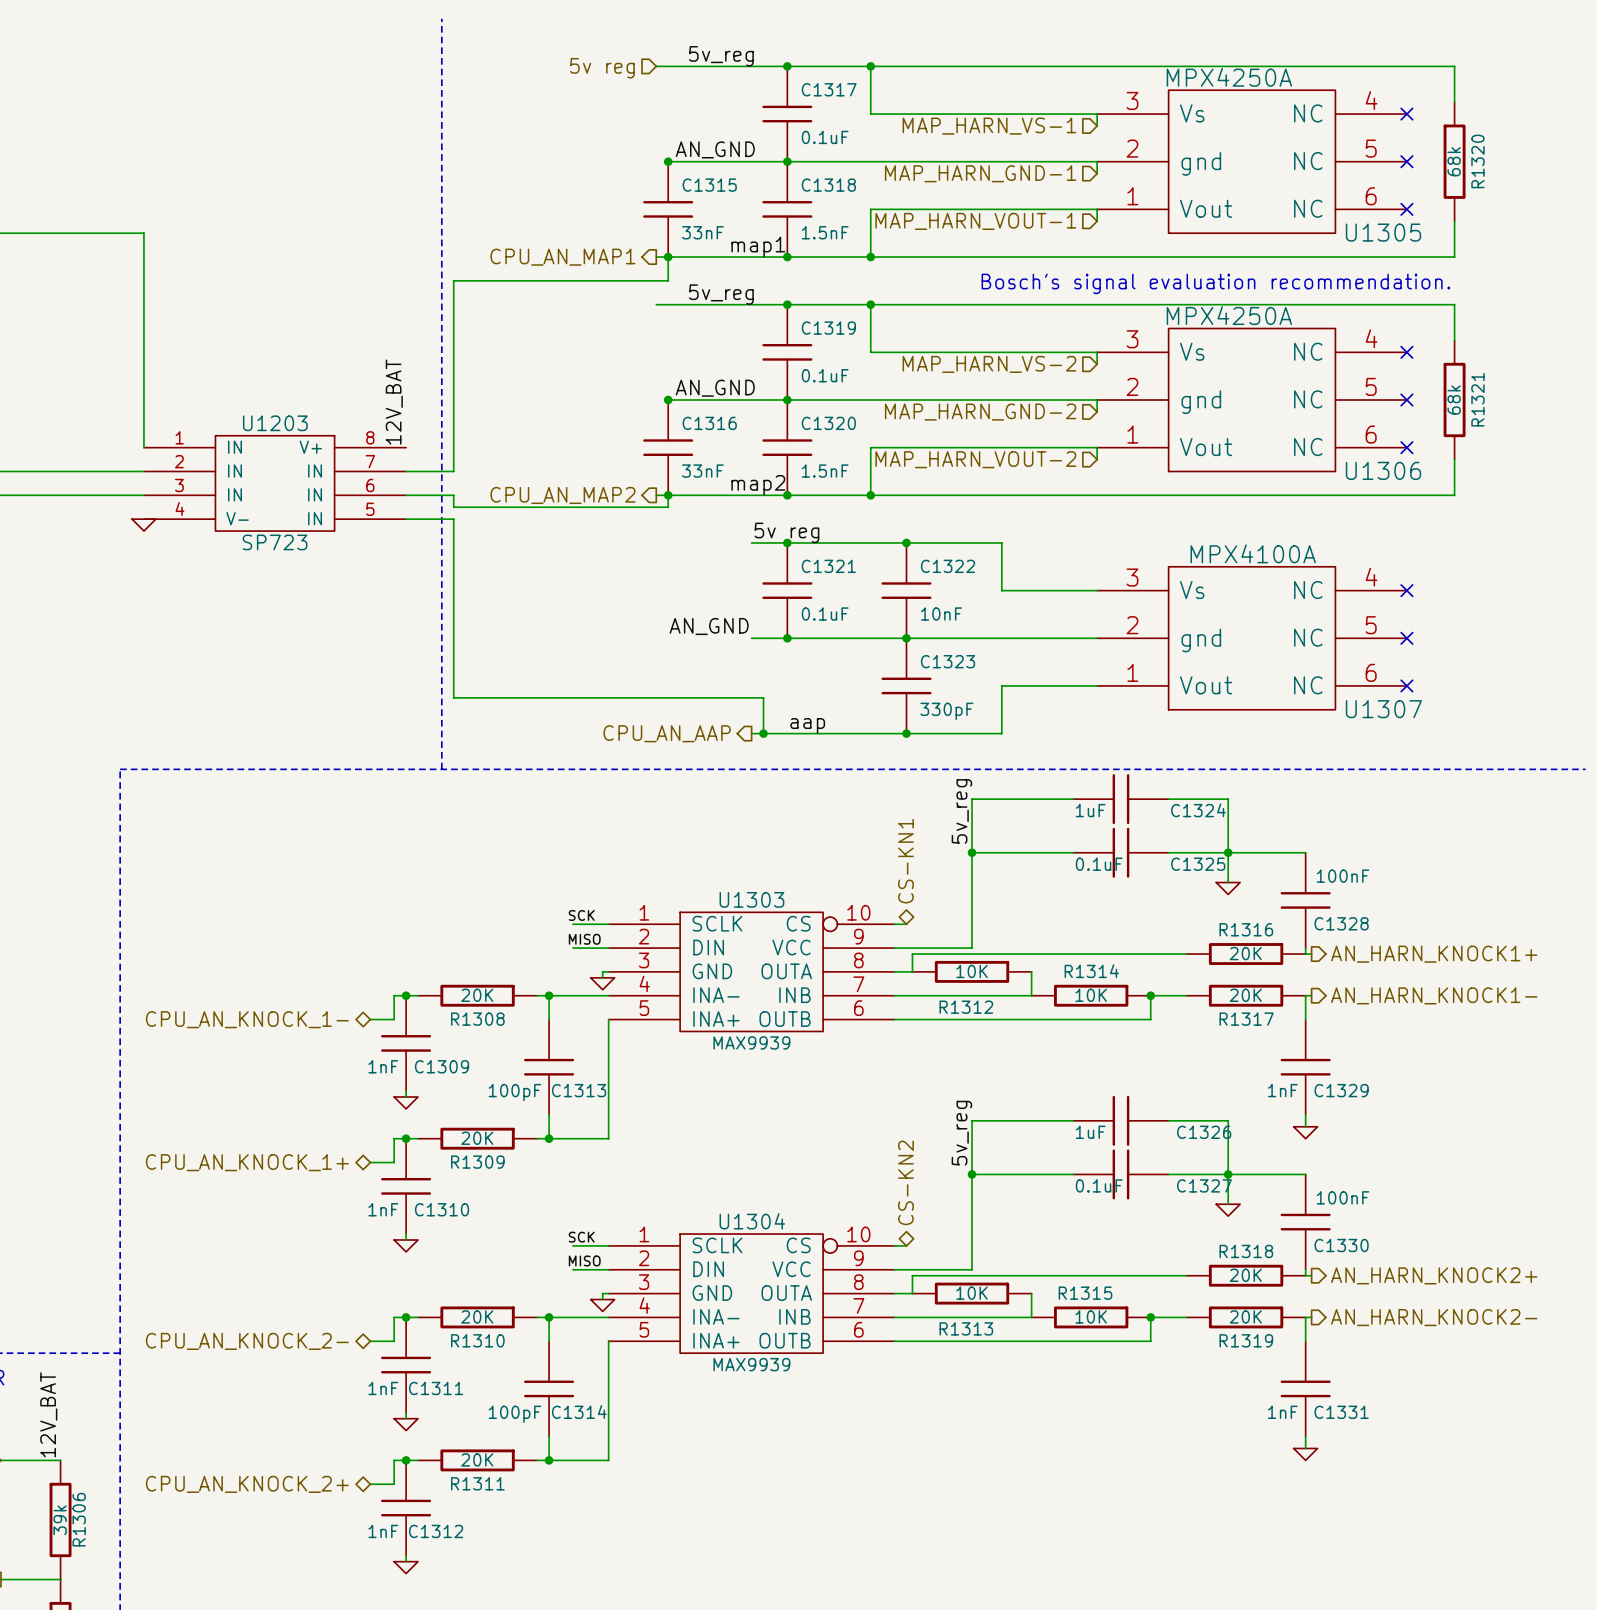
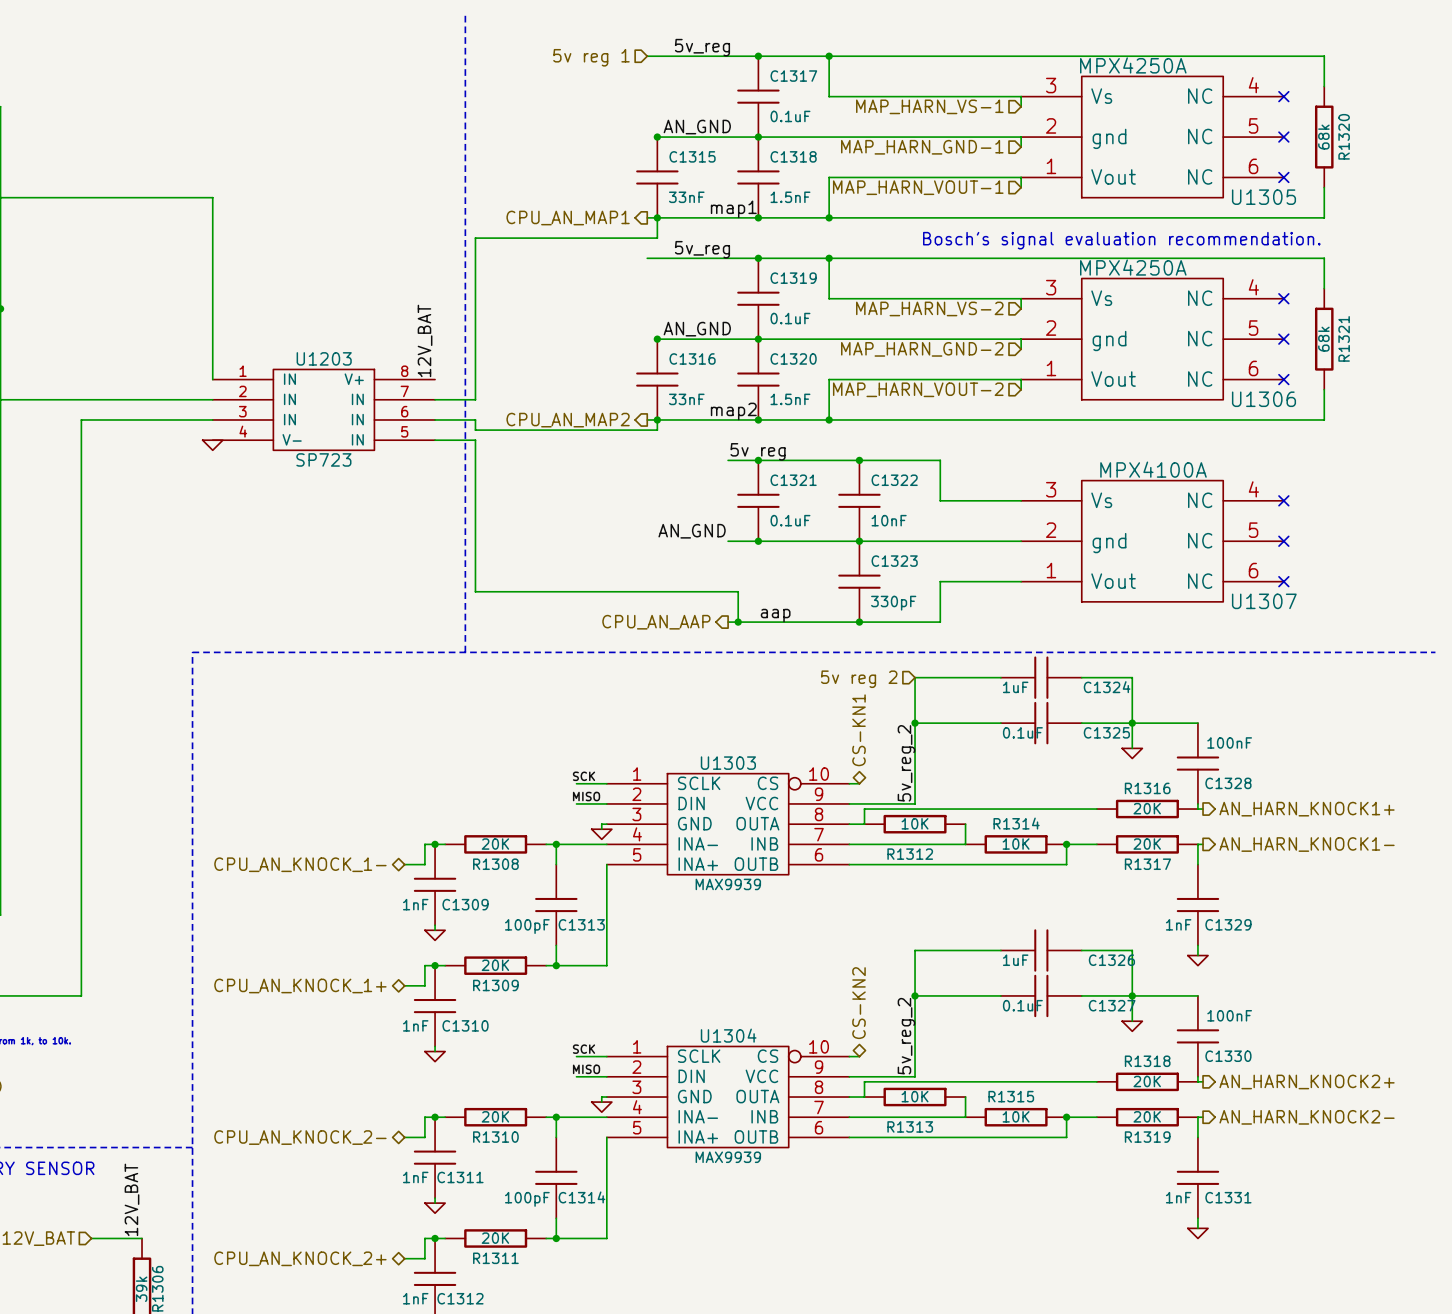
hierarchical label: 5v reg (602, 68) -> 5v reg 1 (591, 57)
hierarchical label: none -> 5v reg 2 (859, 679)
label: 5v_reg (961, 811) -> 5v_reg_2 (906, 763)
label: 5v_reg (961, 1133) -> 5v_reg_2 (906, 1036)

